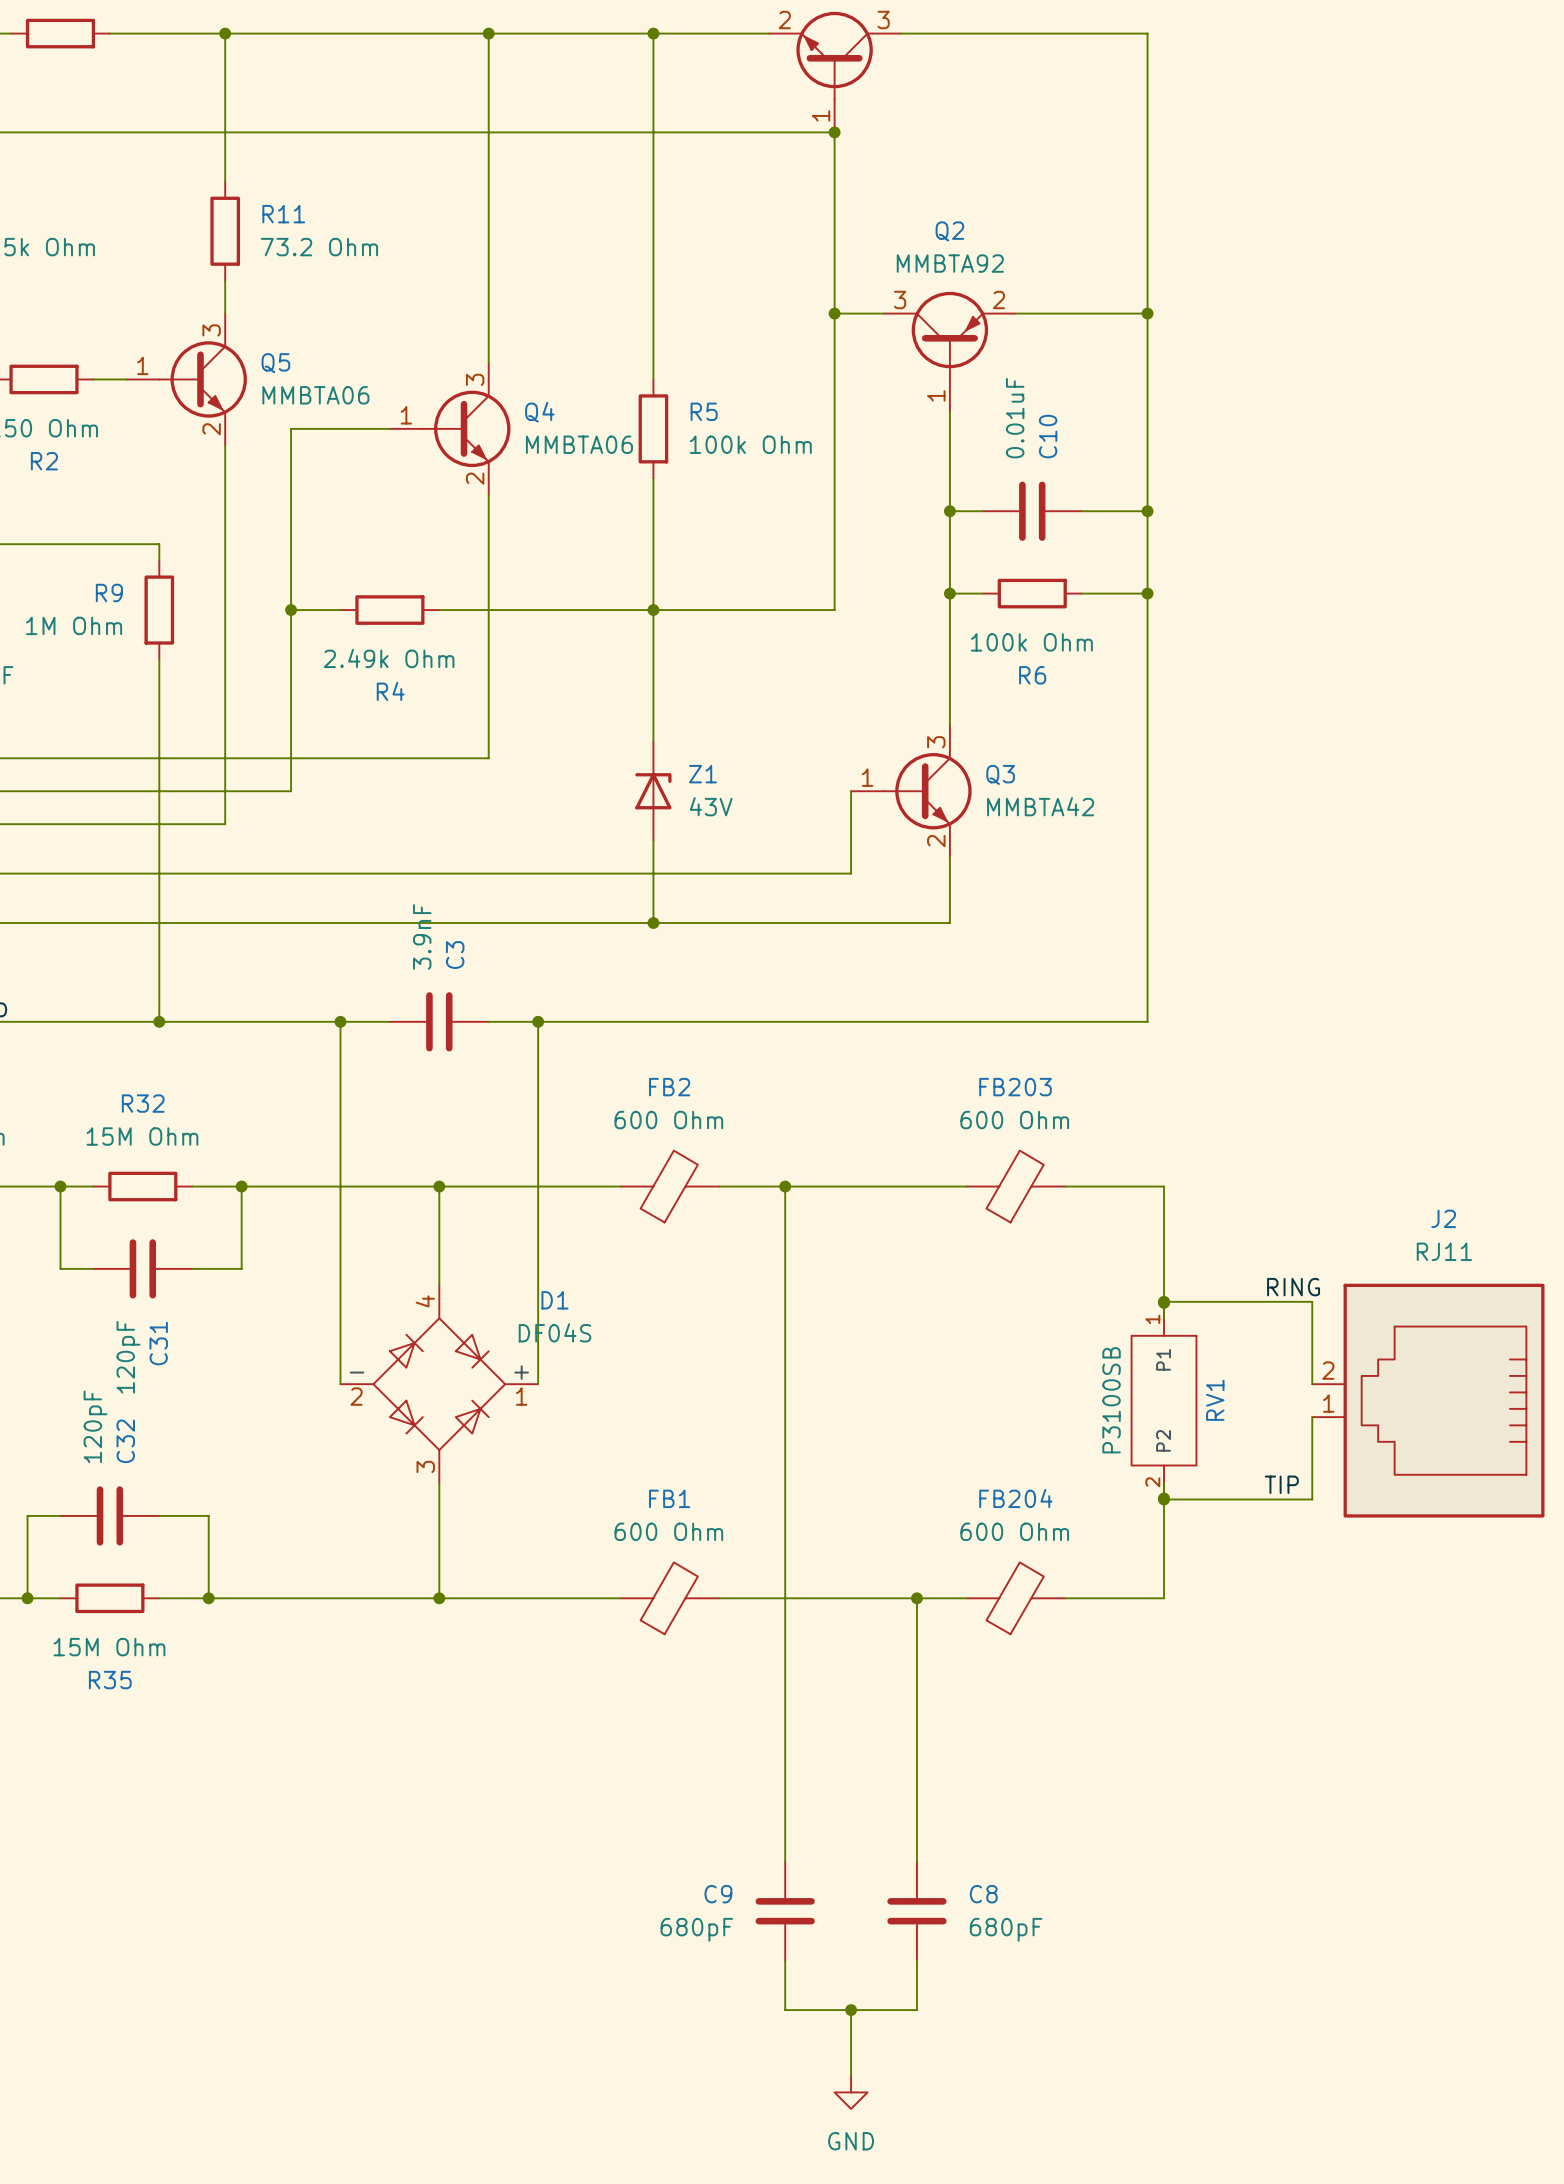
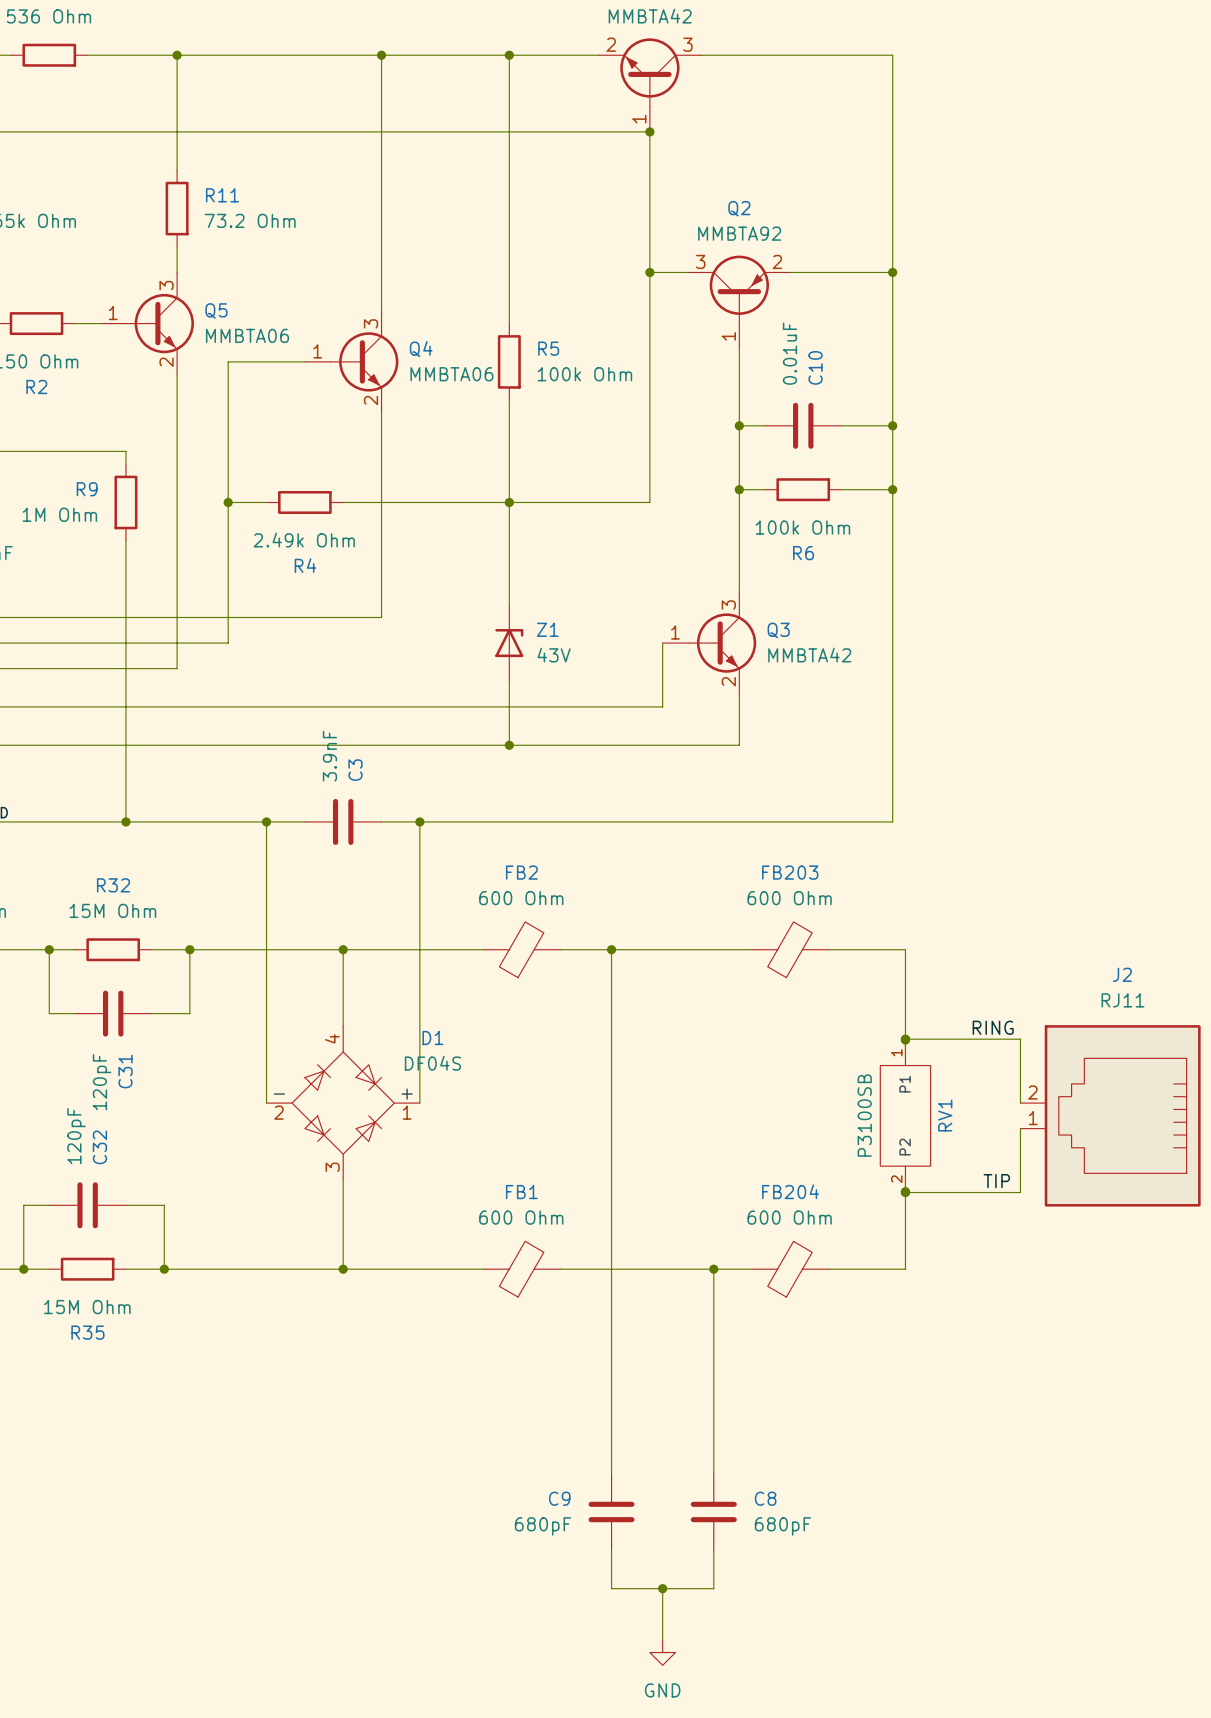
label position: RING (1293, 1287) -> RING (993, 1027)

